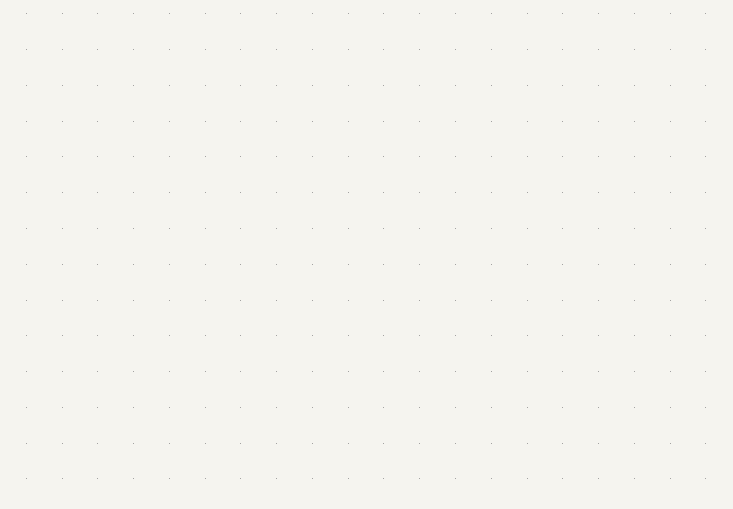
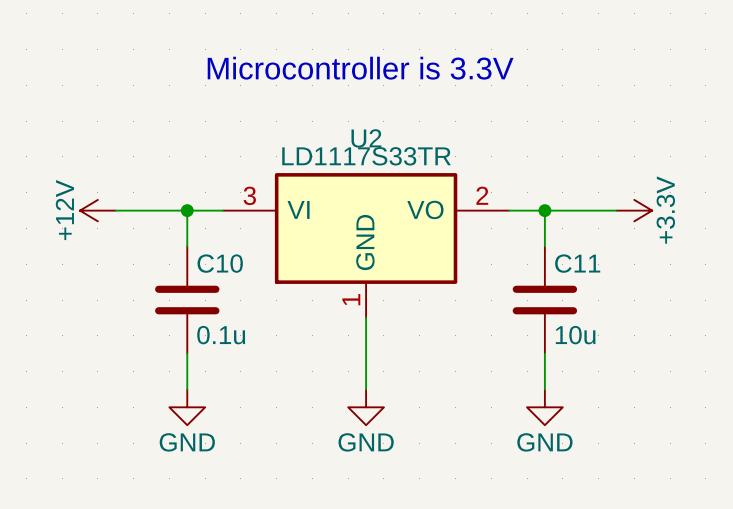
text: none -> Microcontroller is 3.3V (360, 68)
power symbol: none -> +12V (97, 210)
wire: none -> (115, 210) (223, 210)
wire: none -> (187, 210) (187, 246)
junction: none -> (187, 210)
wire: none -> (509, 210) (616, 210)
wire: none -> (544, 210) (544, 246)
junction: none -> (544, 210)
power symbol: none -> +3.3V (634, 210)
U2: none -> LD1117S33TR (366, 245)
C10: none -> 0.1u (187, 300)
C11: none -> 10u (544, 300)
wire: none -> (366, 317) (366, 389)
wire: none -> (187, 353) (187, 389)
wire: none -> (544, 353) (544, 389)
power symbol: none -> GND (187, 407)
power symbol: none -> GND (366, 407)
power symbol: none -> GND (544, 407)

